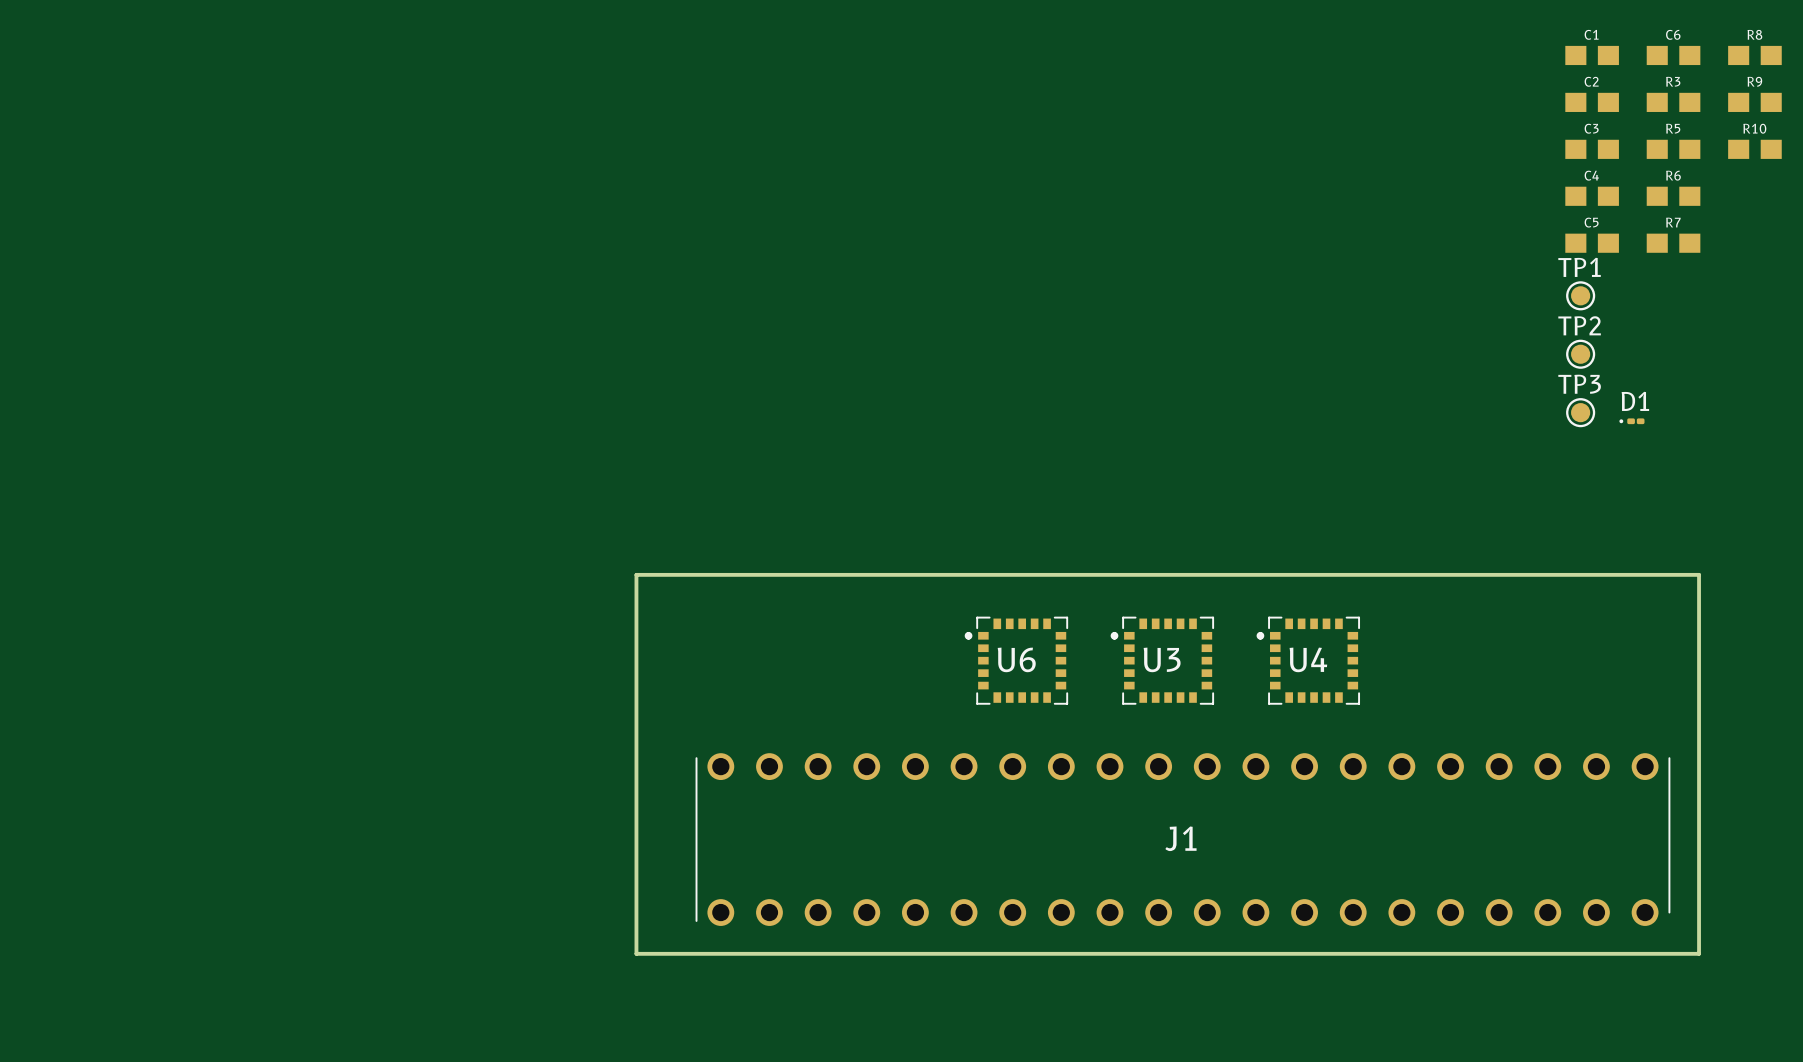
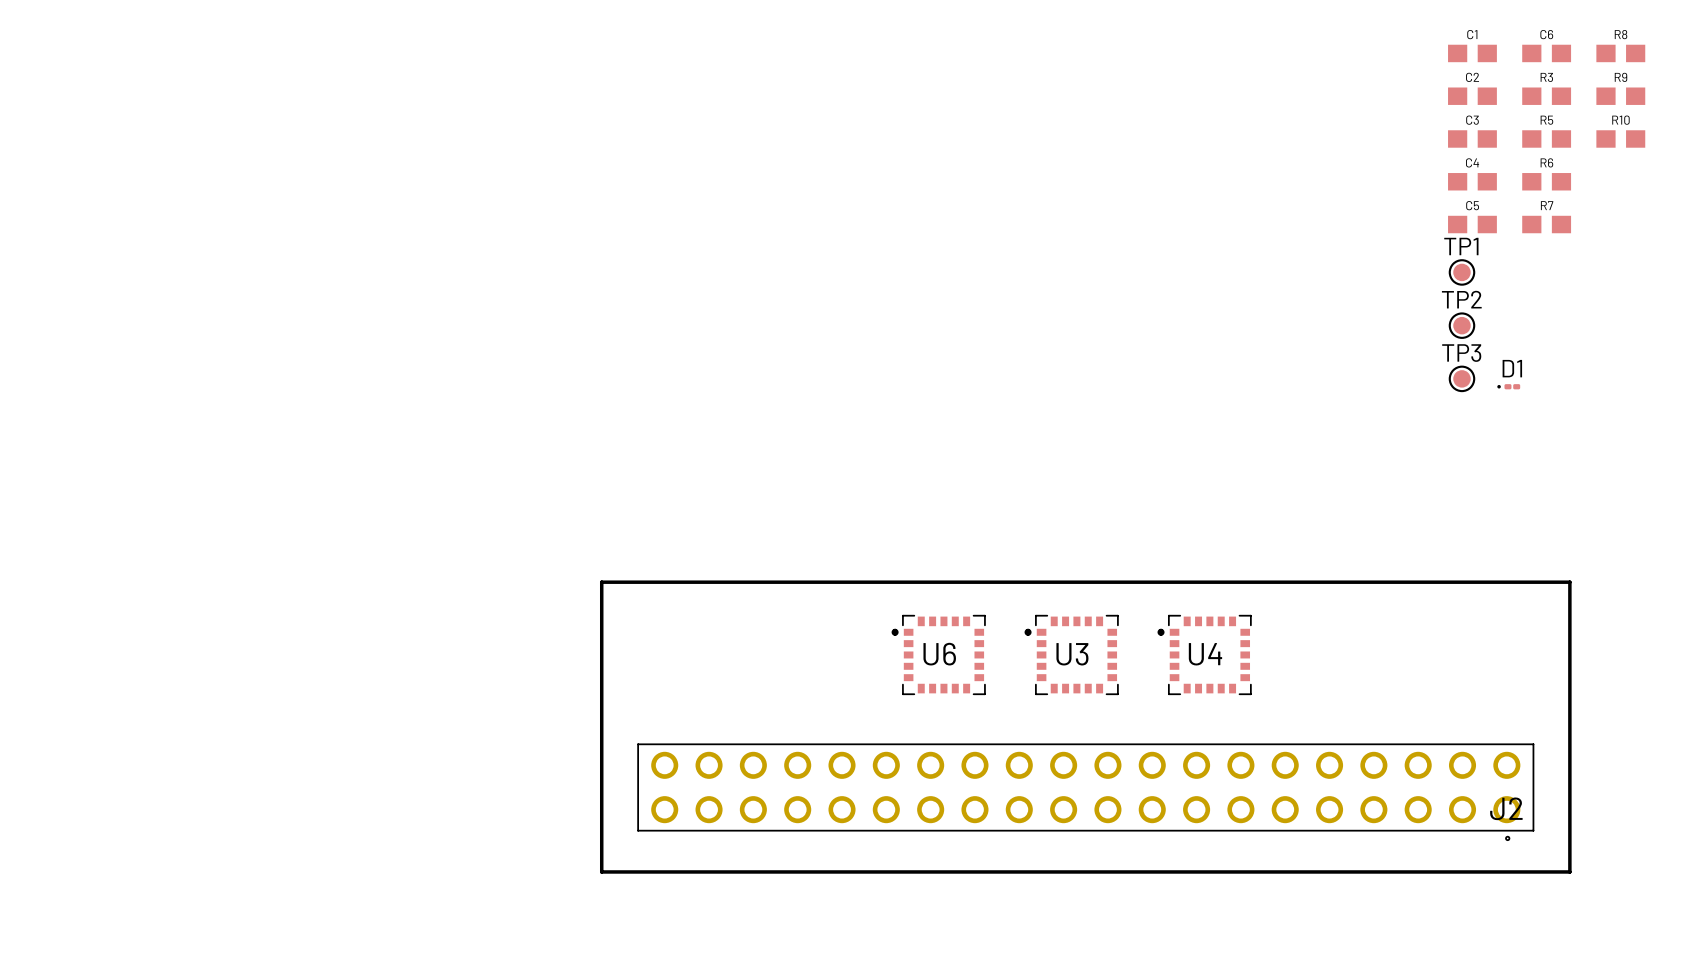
board edge: (636, 635) (636, 574) (1699, 574) (1699, 635) -> (601, 582) (1569, 582)
U6 position: (1016, 660) -> (938, 654)
U3 position: (1162, 660) -> (1071, 654)
U4 position: (1308, 660) -> (1204, 654)
J1: (1182, 839) -> none
J2: none -> (1085, 792)

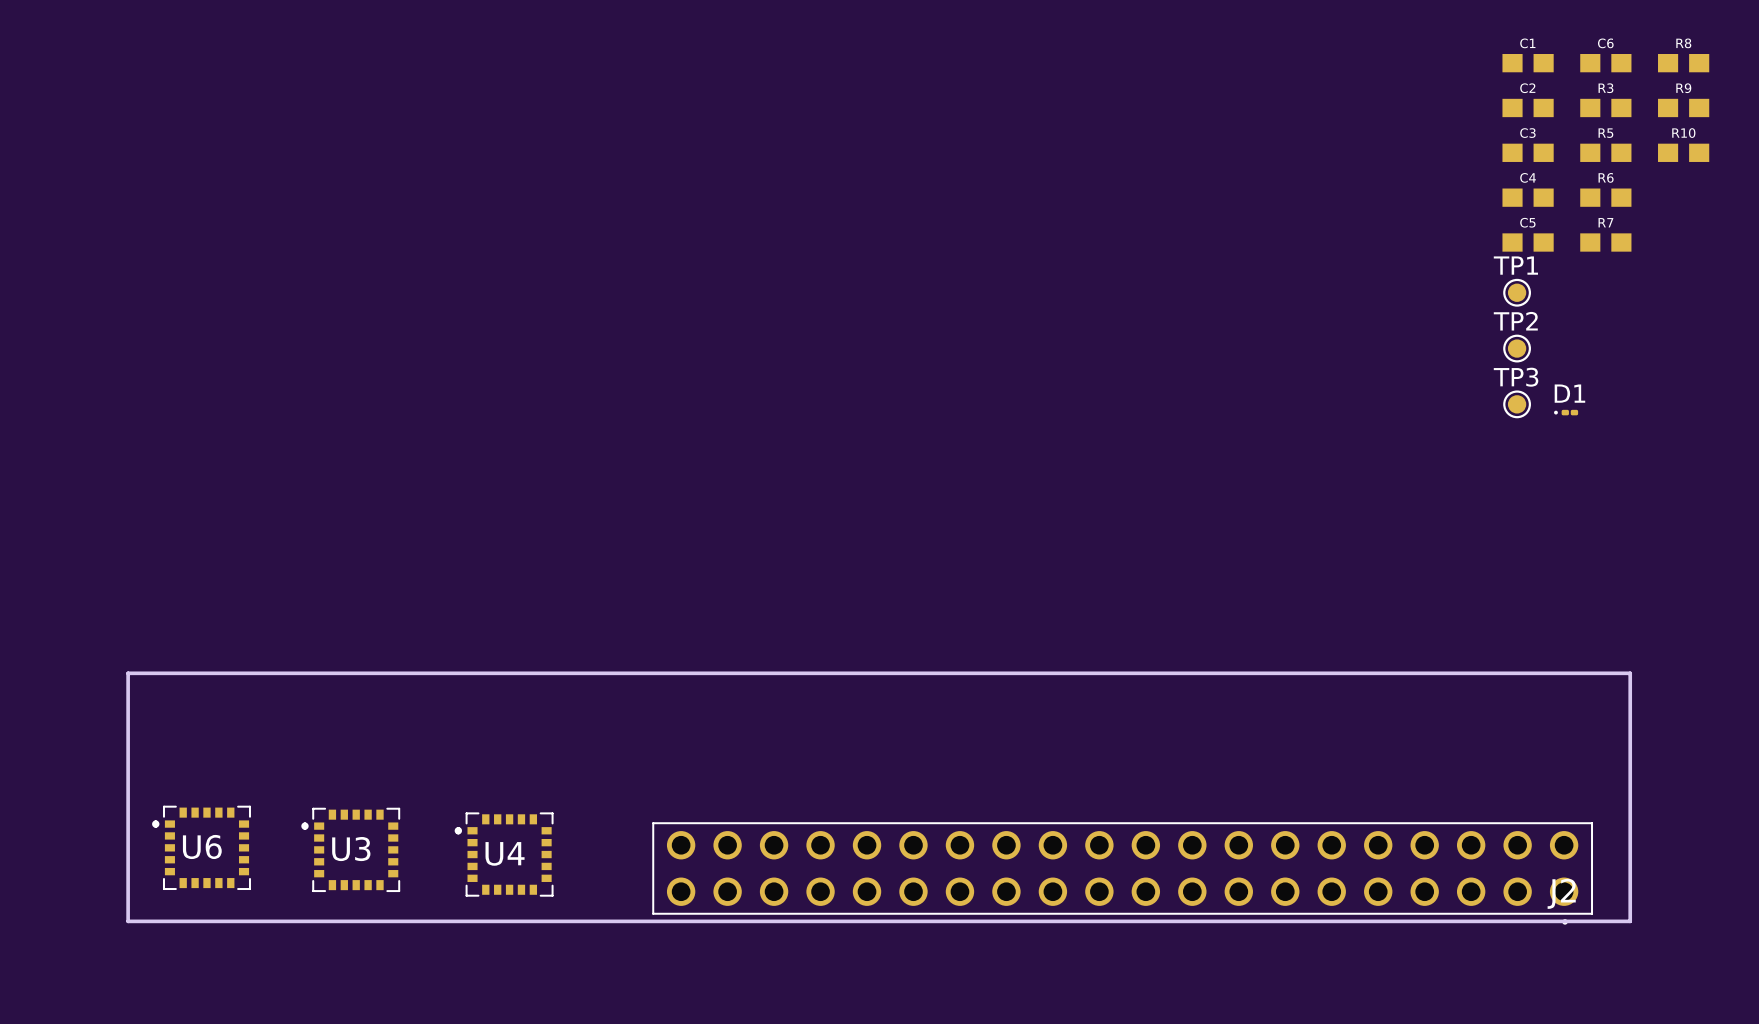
board edge: (1569, 635) (1569, 582) (601, 582) (601, 871) -> (1630, 673) (128, 673) (128, 921) (615, 921)
U6 position: (938, 654) -> (201, 847)
U3 position: (1071, 654) -> (350, 849)
U4 position: (1204, 654) -> (504, 854)
J2 position: (1085, 792) -> (1122, 873)

